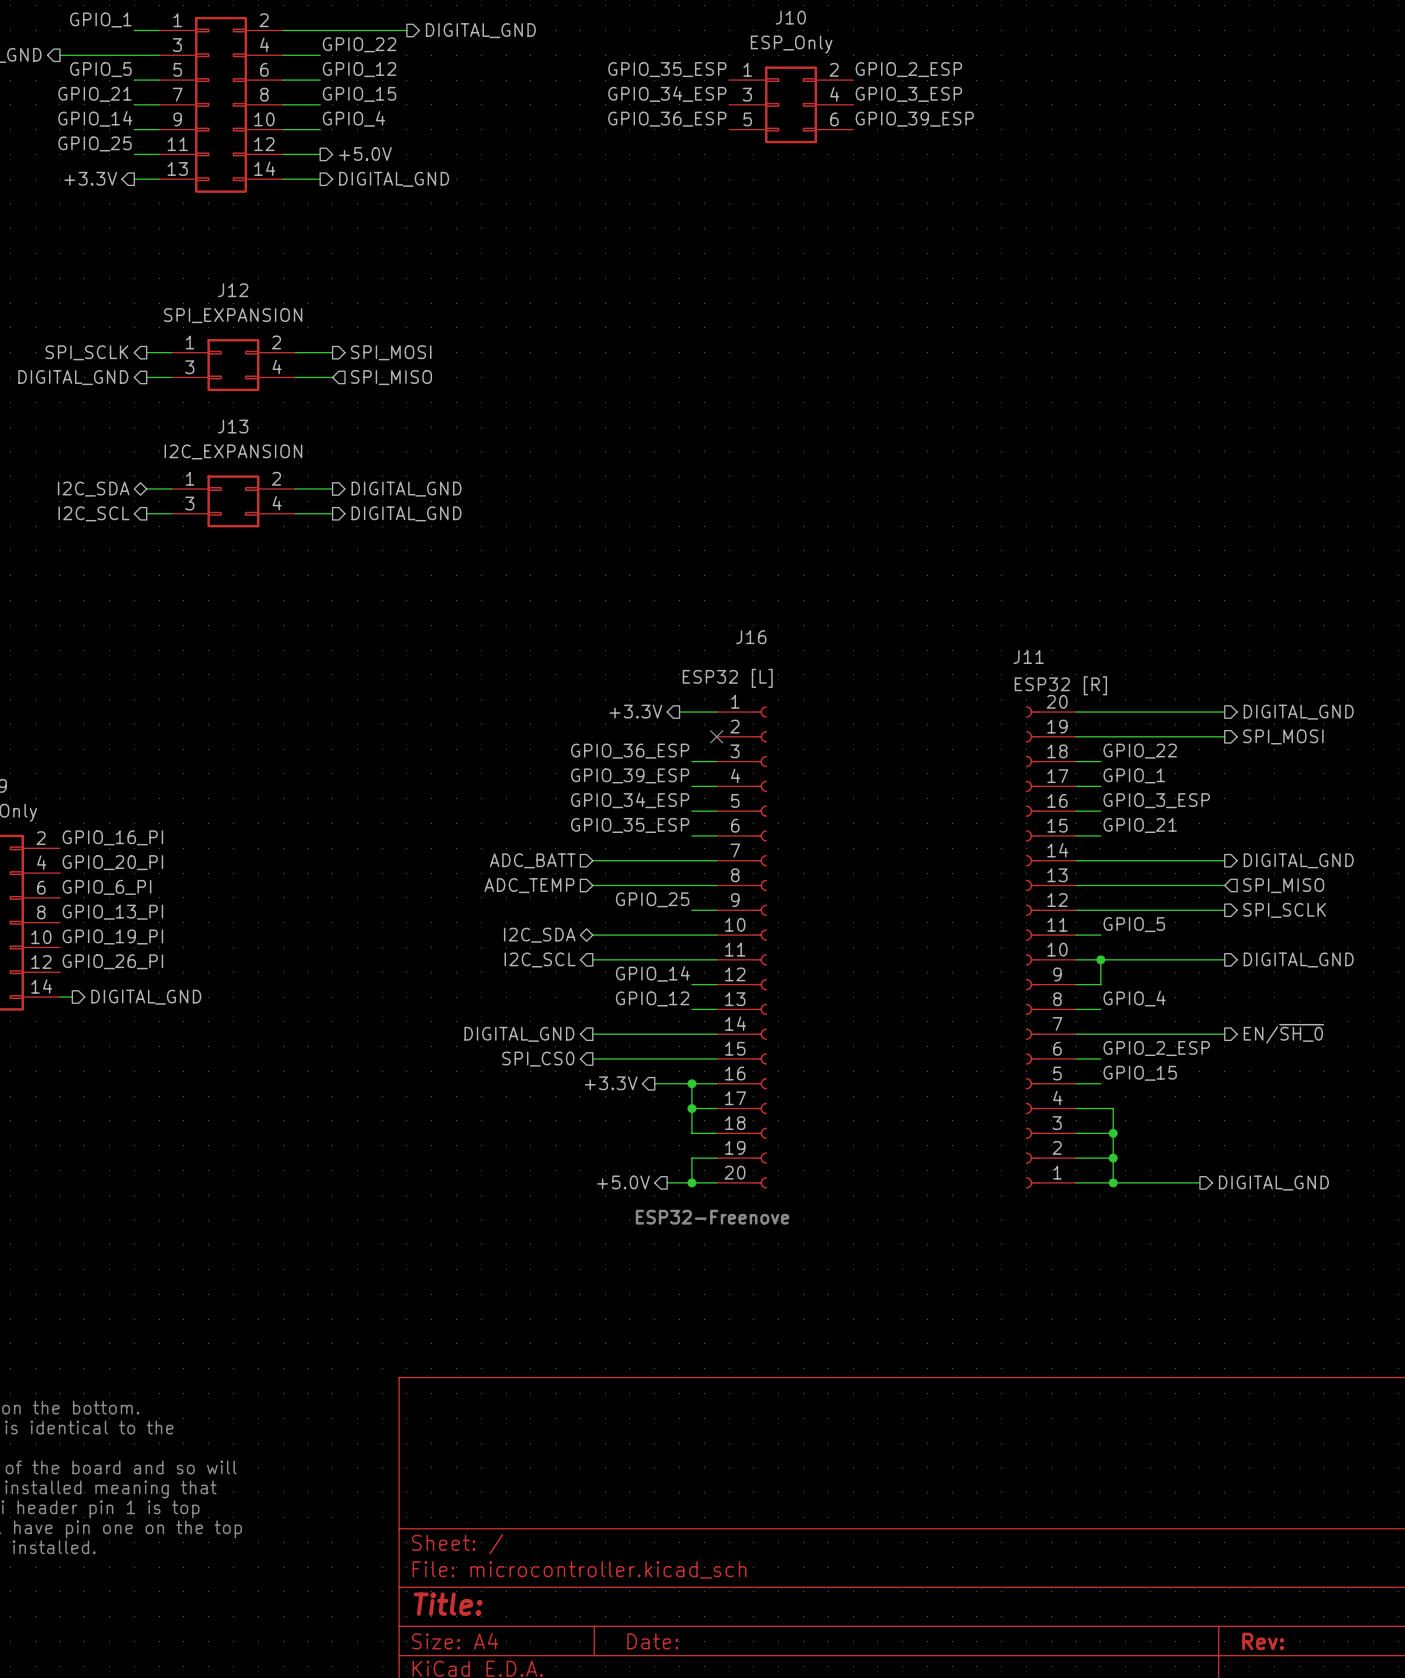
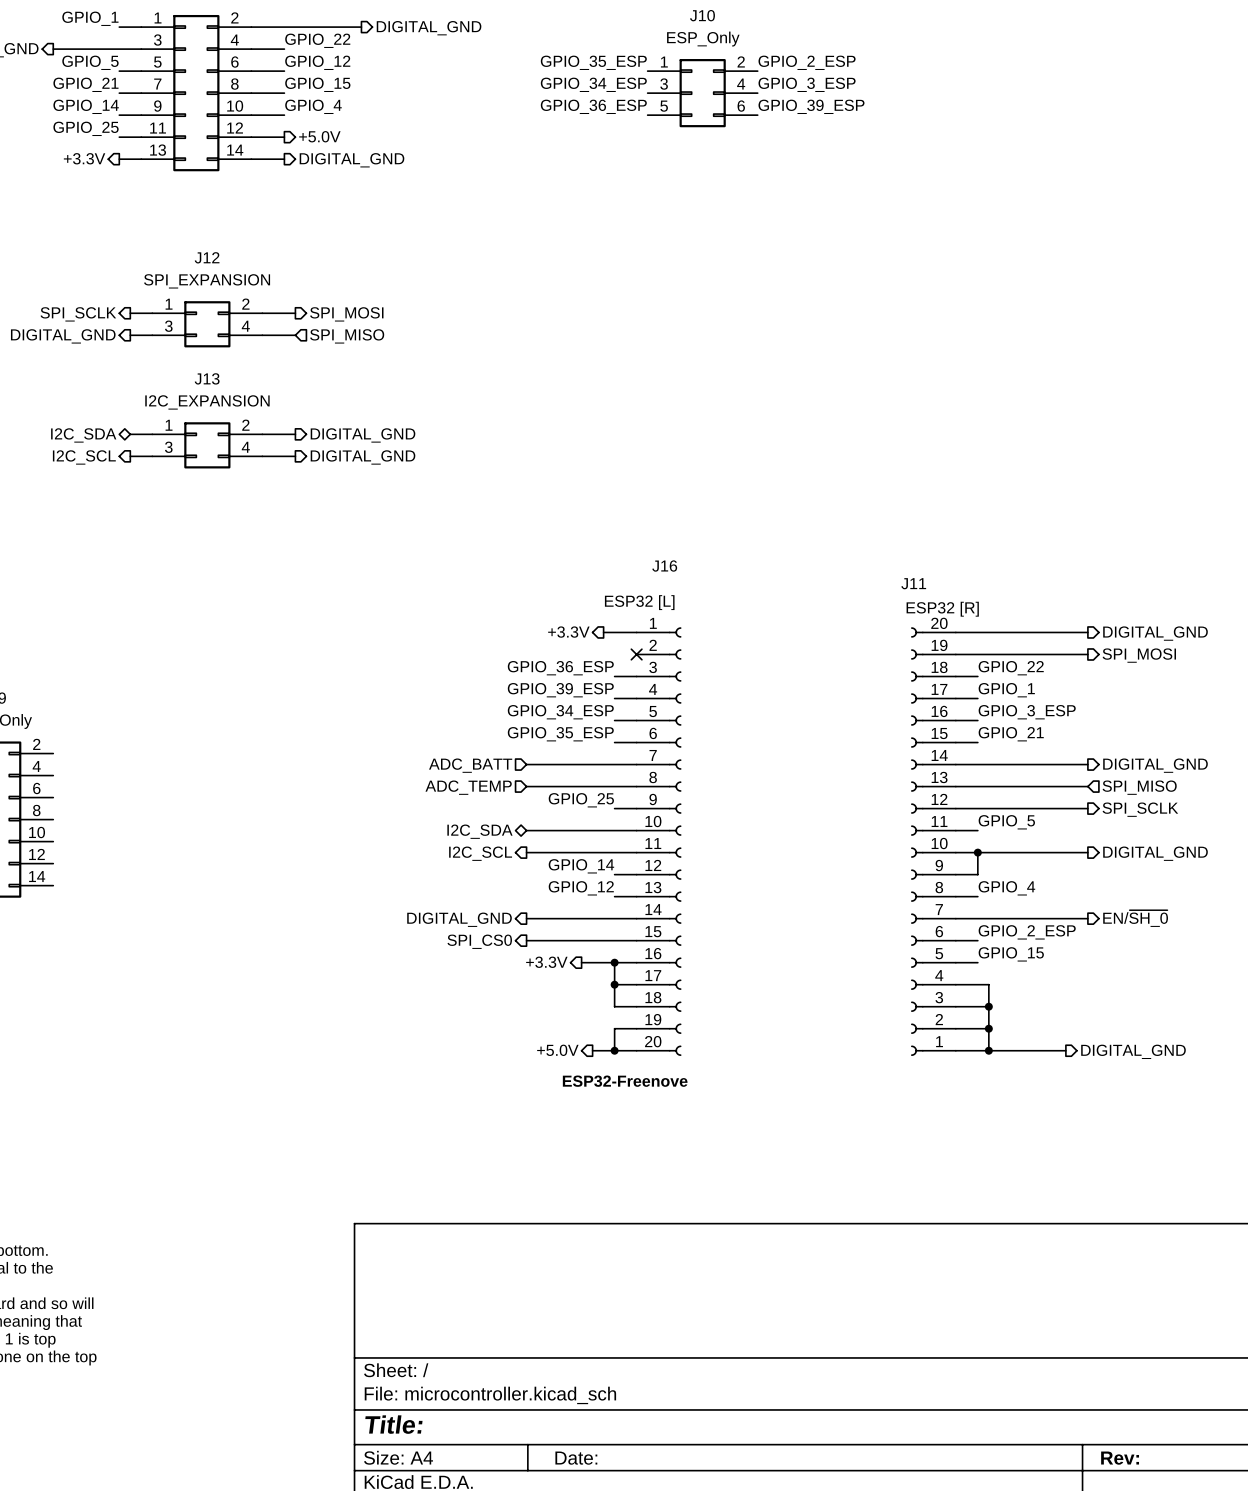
label: GPIO_16_PI (112, 837) -> none
label: GPIO_20_PI (112, 862) -> none
label: GPIO_6_PI (106, 887) -> none
label: GPIO_13_PI (112, 912) -> none
label: GPIO_19_PI (112, 936) -> none
label: GPIO_26_PI (112, 961) -> none
wire: (59, 997) (72, 997) -> none
hierarchical label: DIGITAL_GND (146, 997) -> none

